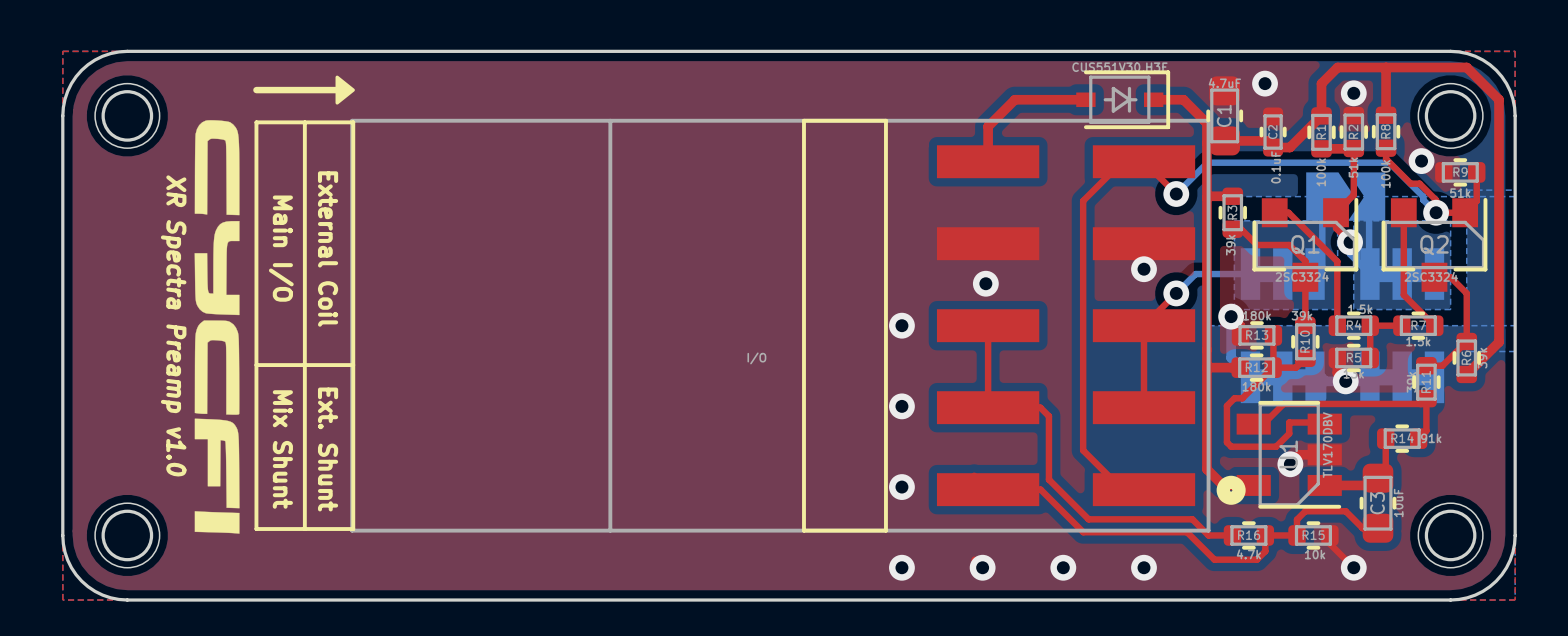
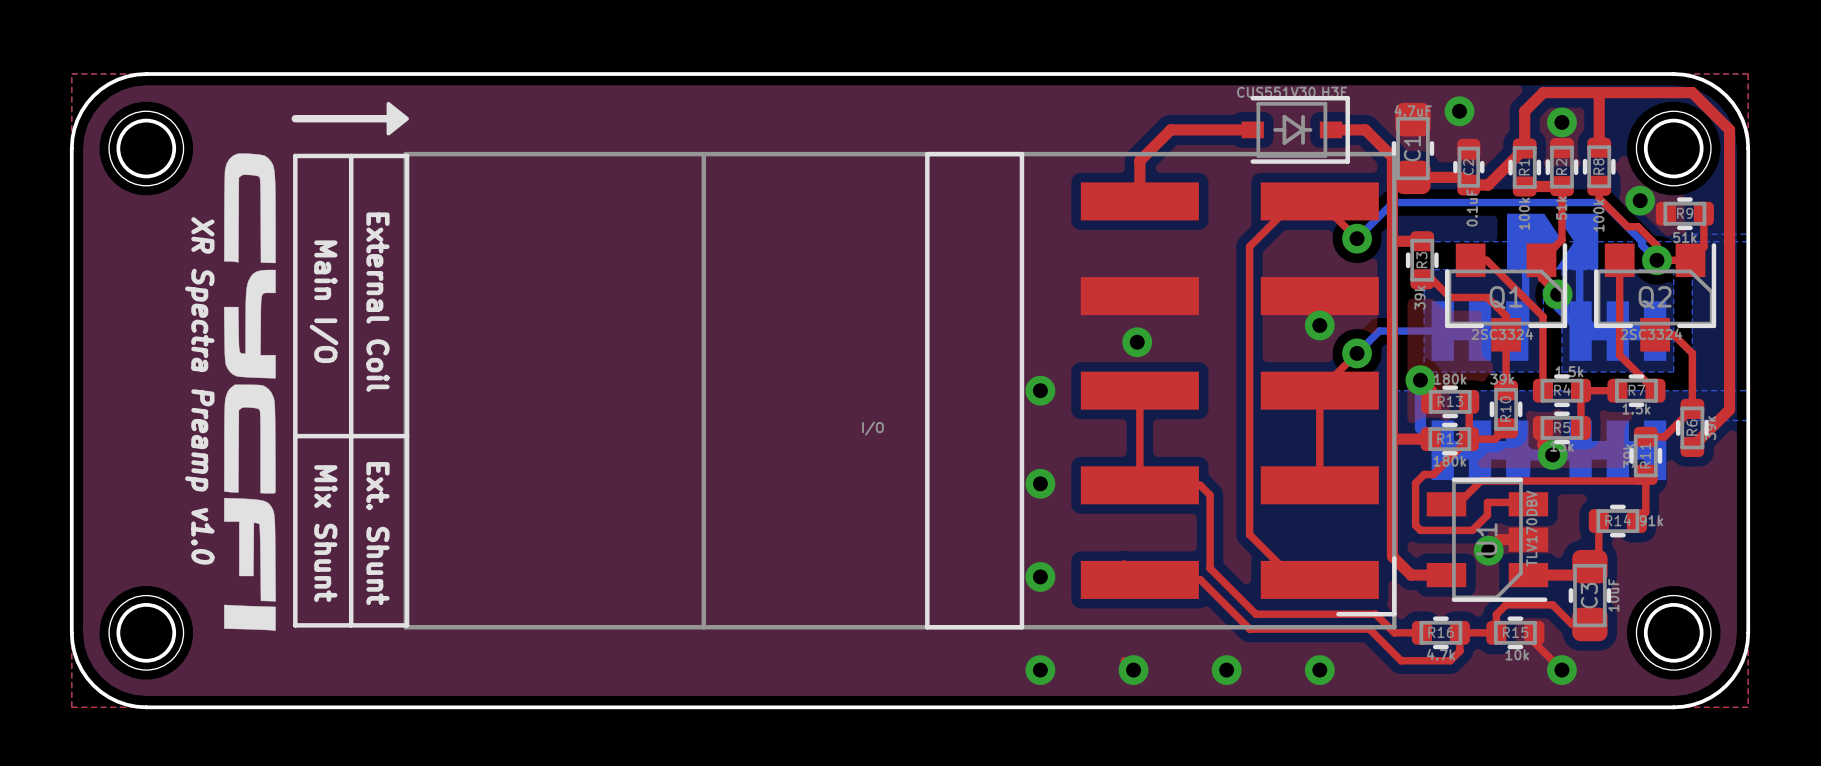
part footprint: [350, 118, 1246, 533] -> [403, 151, 1397, 630]

